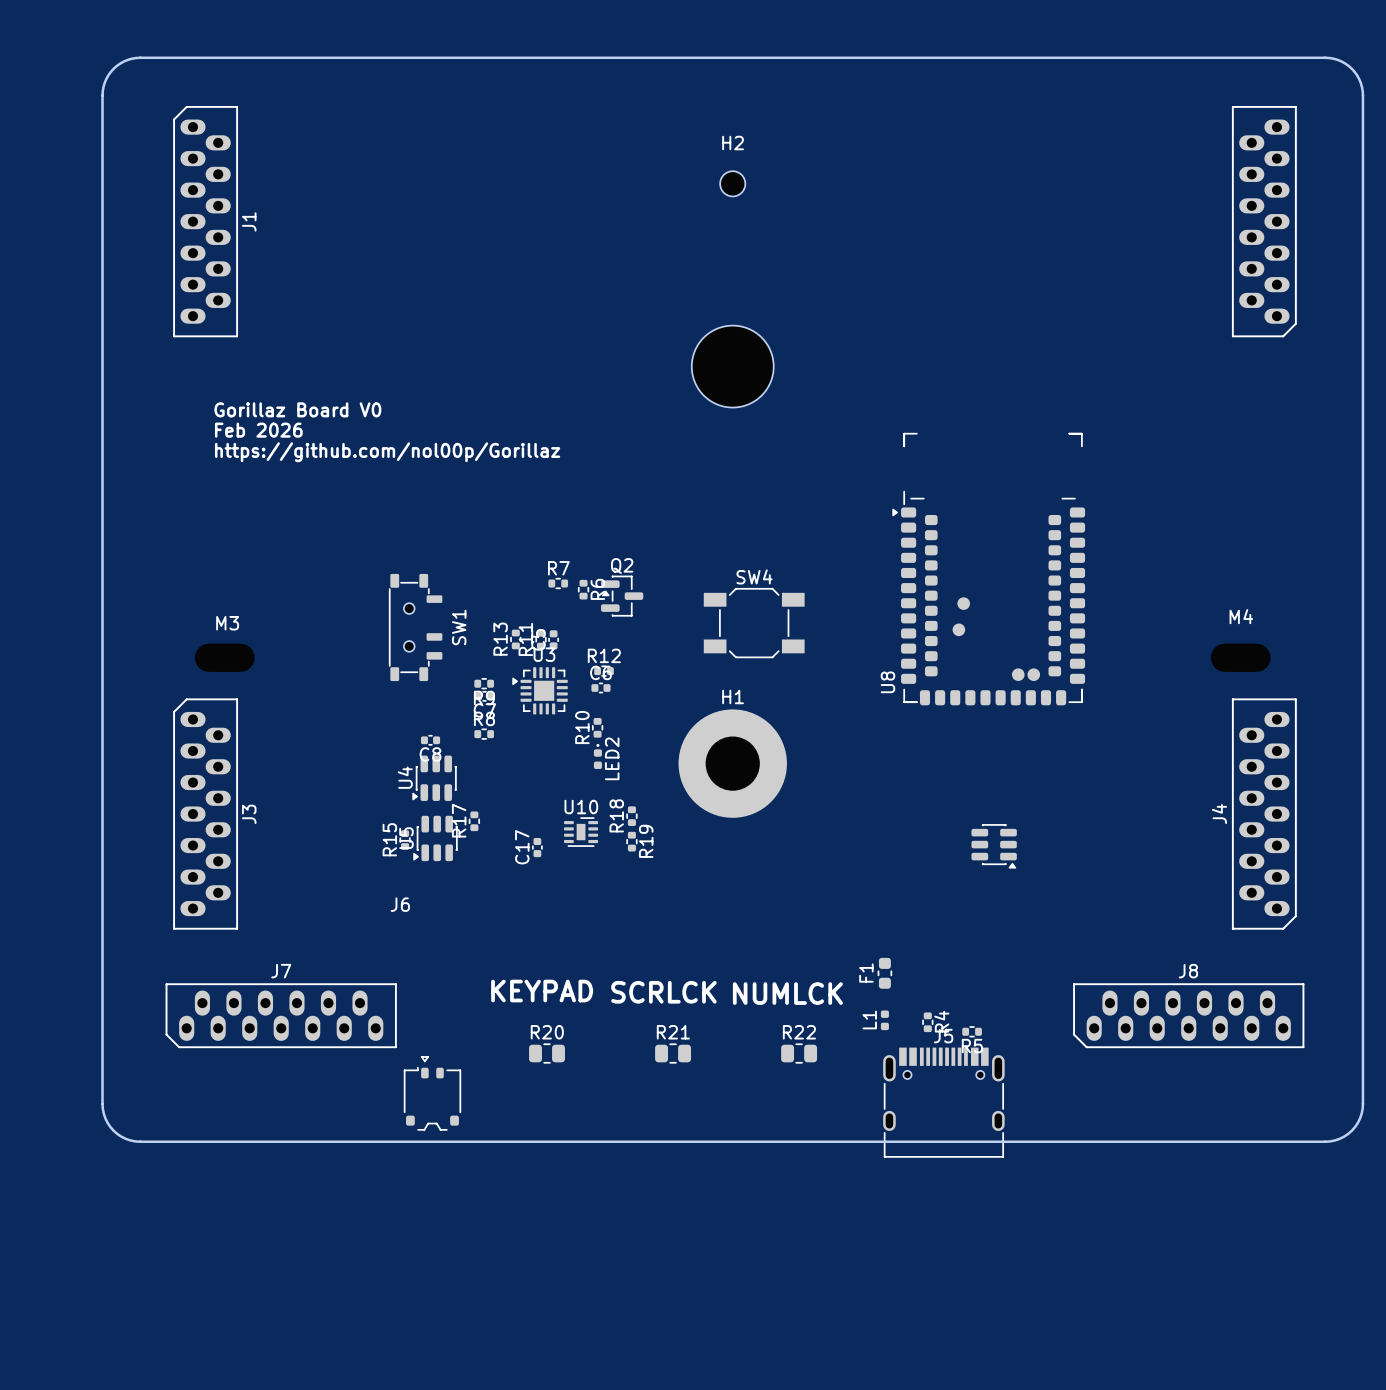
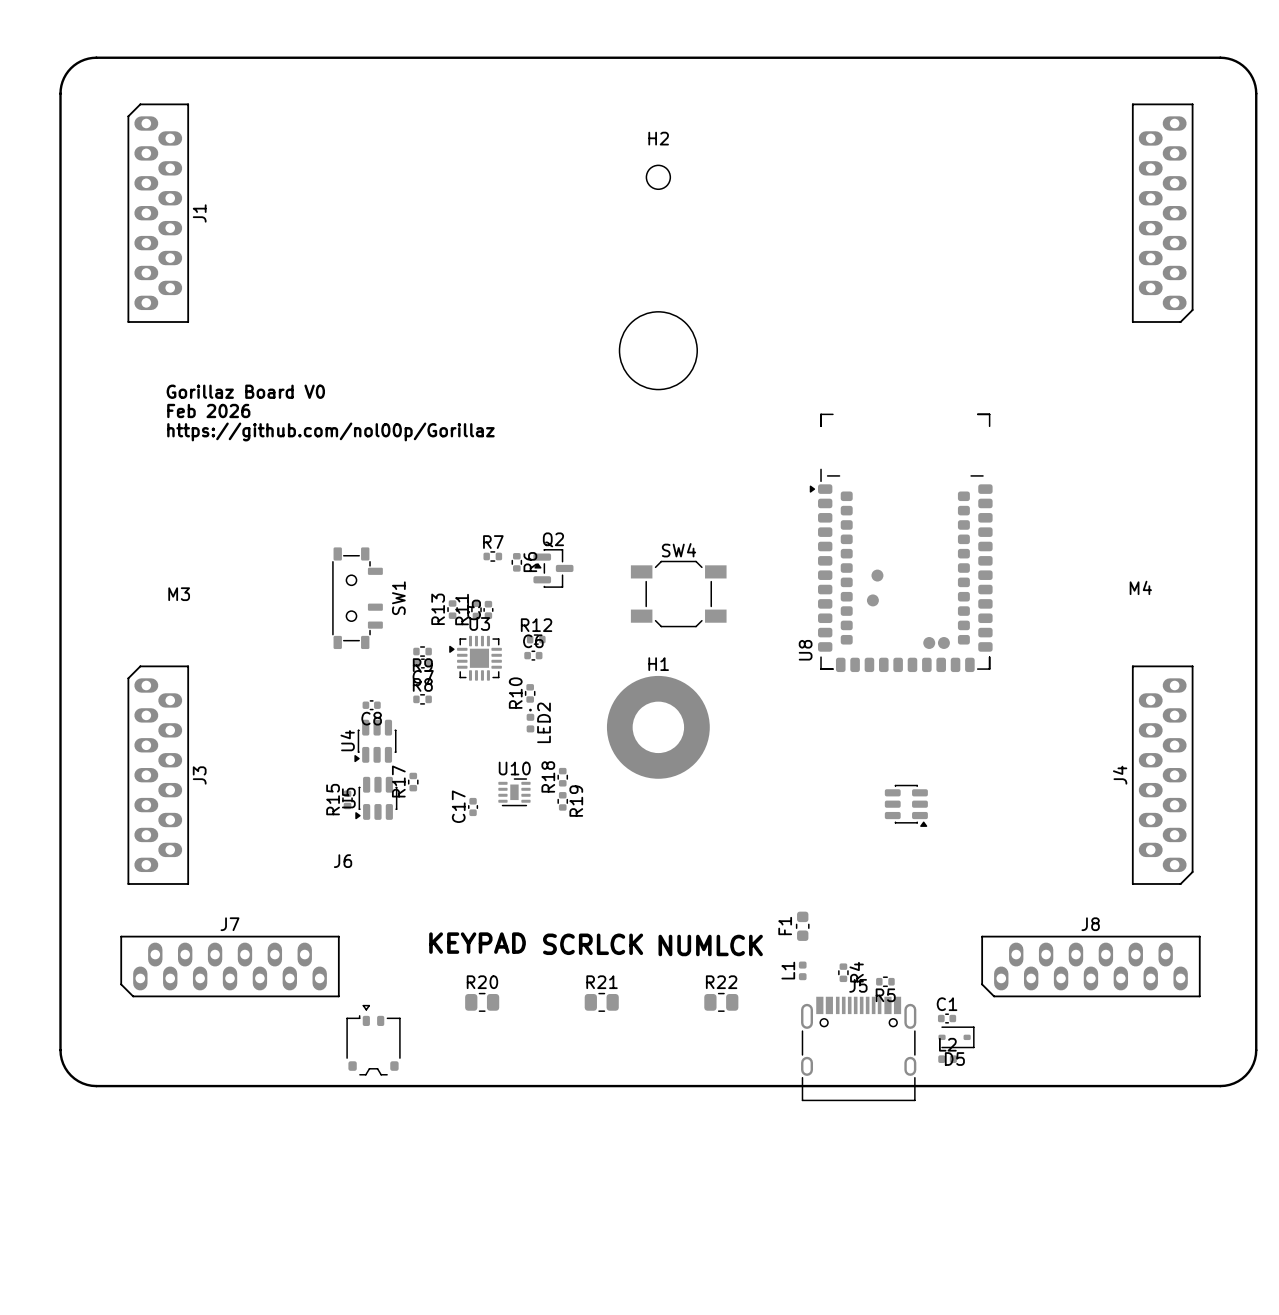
C1: none -> (947, 1018)
D5: none -> (956, 1037)
L2: none -> (947, 1059)

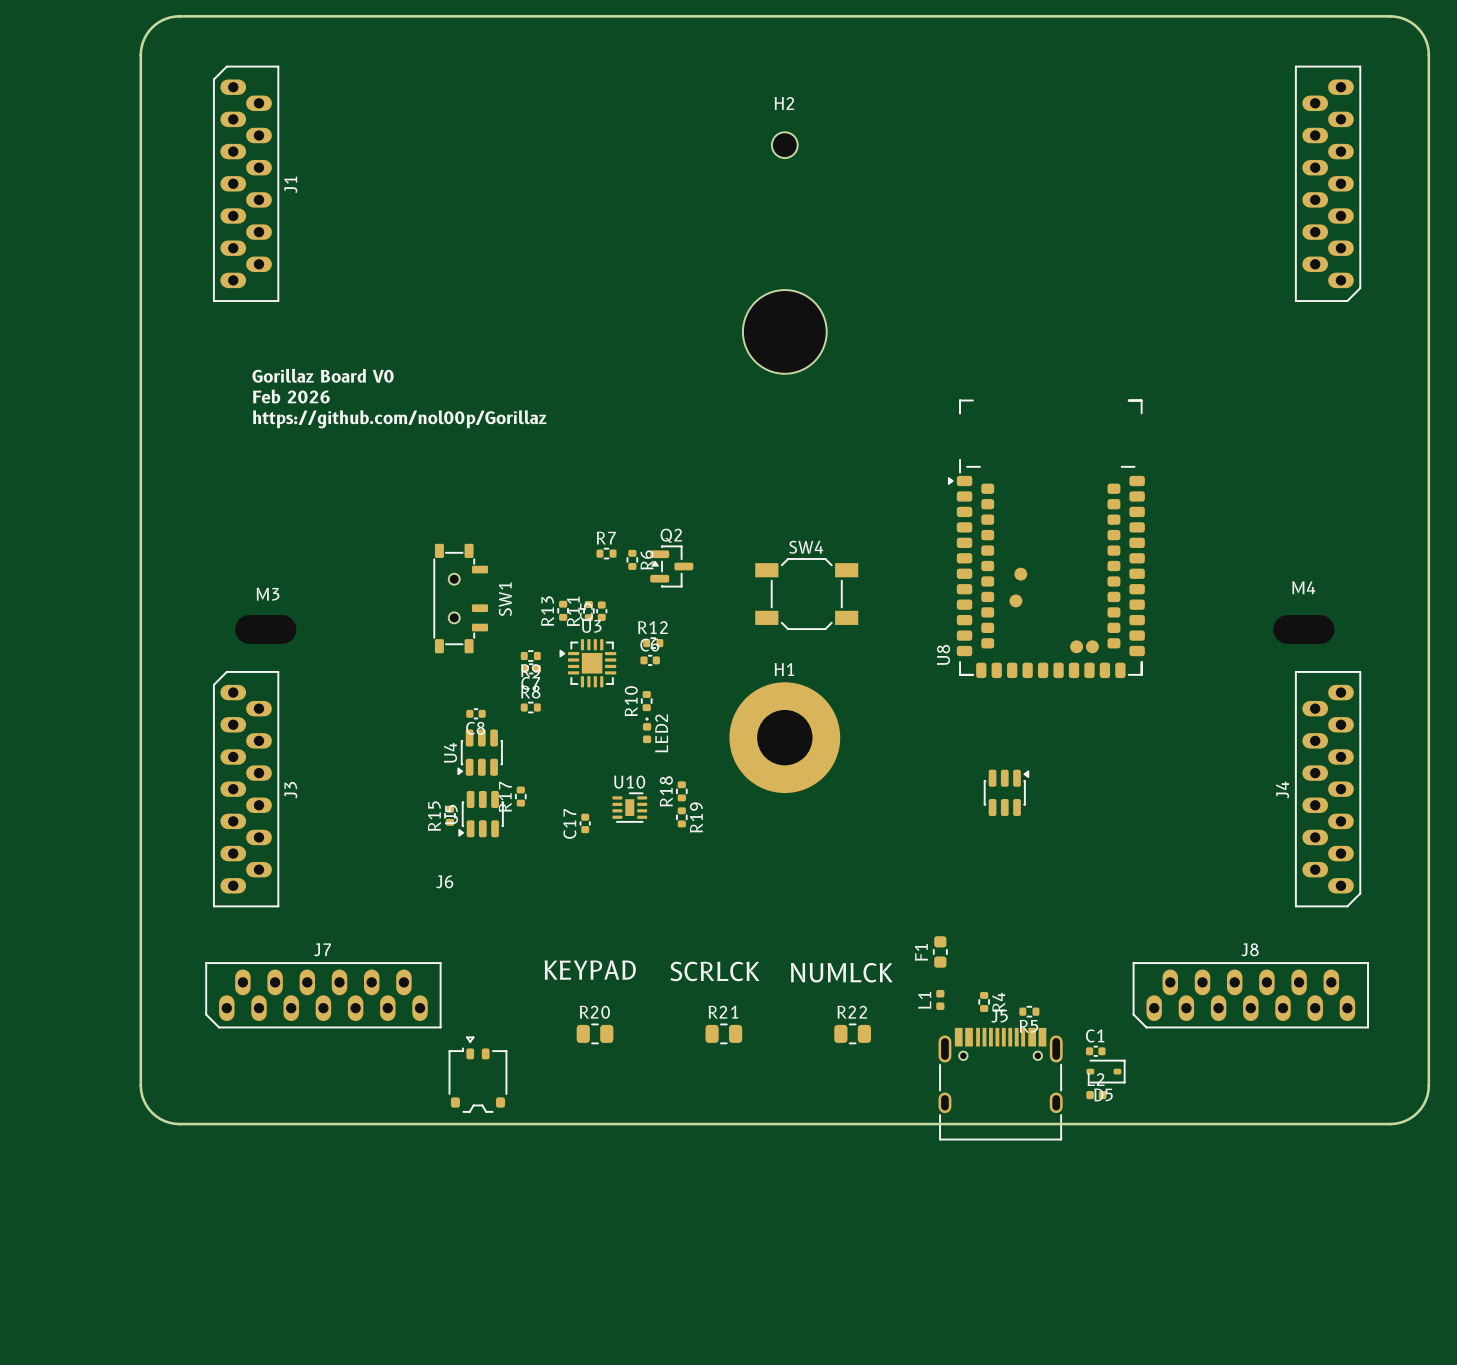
part rotation: 0° (906, 805) -> 90° counterclockwise (1006, 792)
part position: (906, 805) -> (1006, 792)

